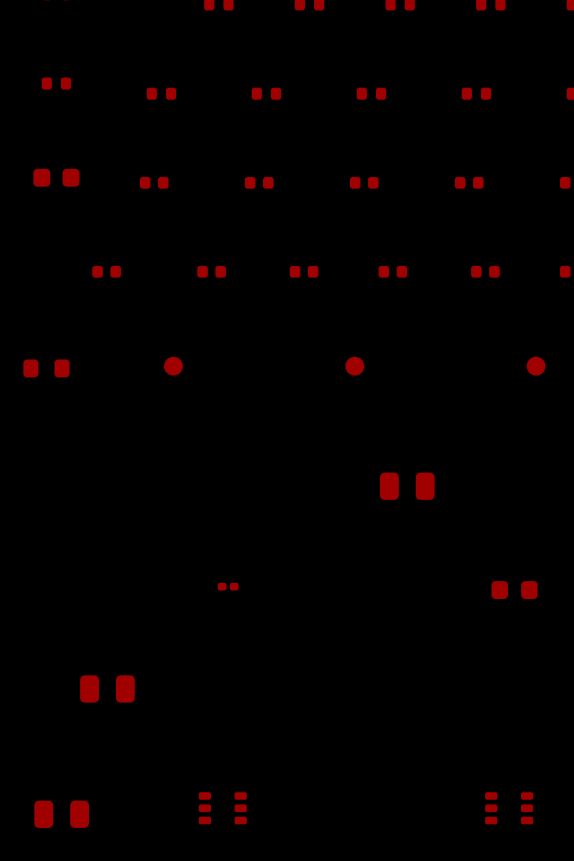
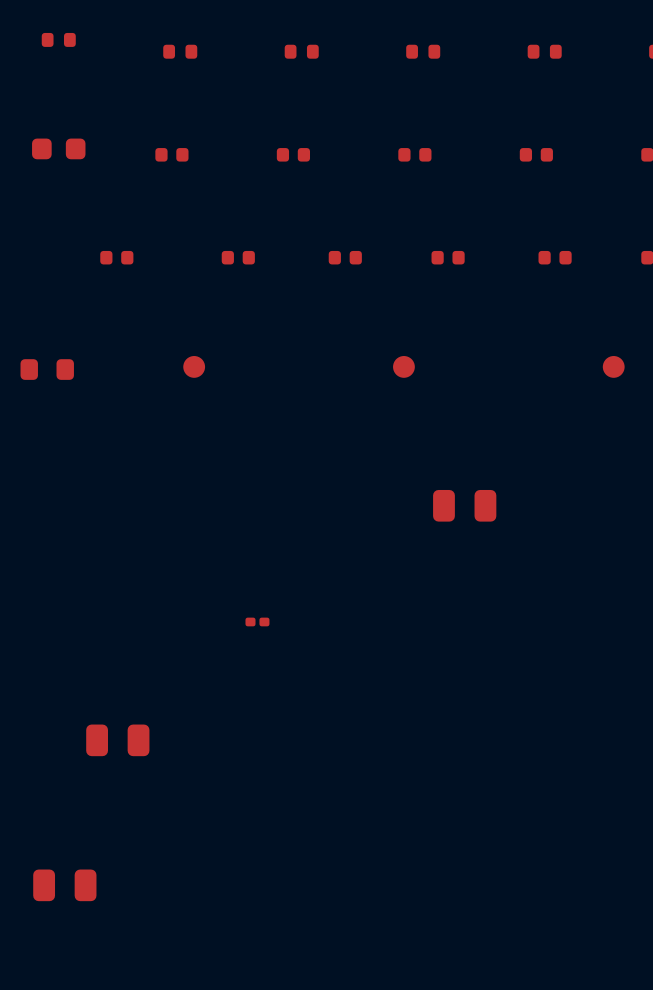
part: (514, 590) -> none
part: (222, 808) -> none
part: (509, 808) -> none

